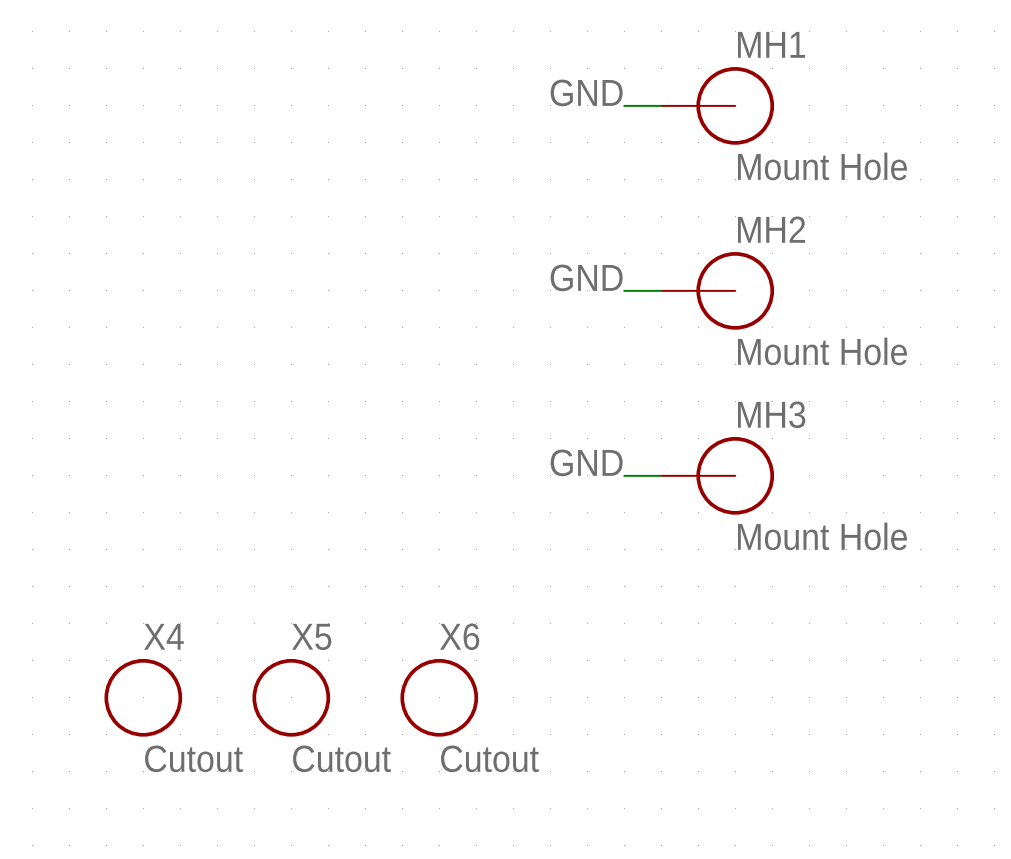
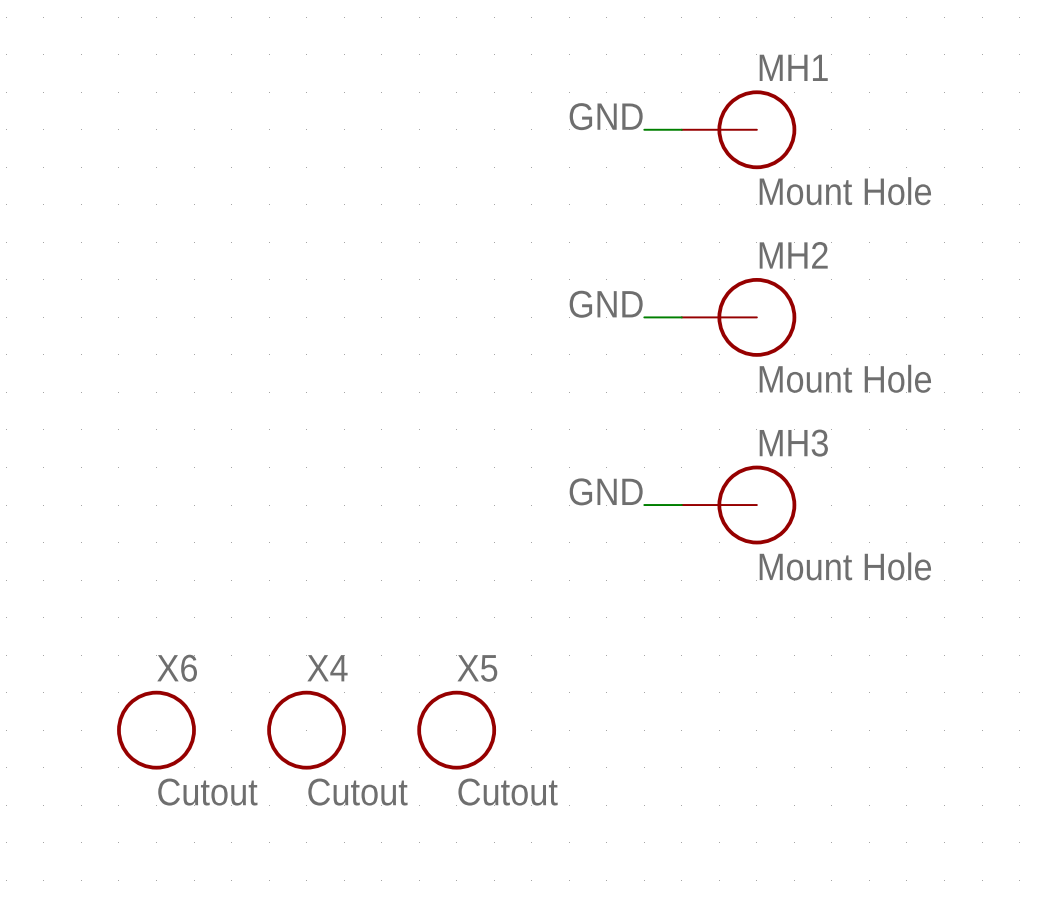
X4 name: X4 (163, 636) -> X6 (177, 668)
X5 name: X5 (311, 636) -> X4 (327, 668)
X6 name: X6 (459, 636) -> X5 (477, 668)

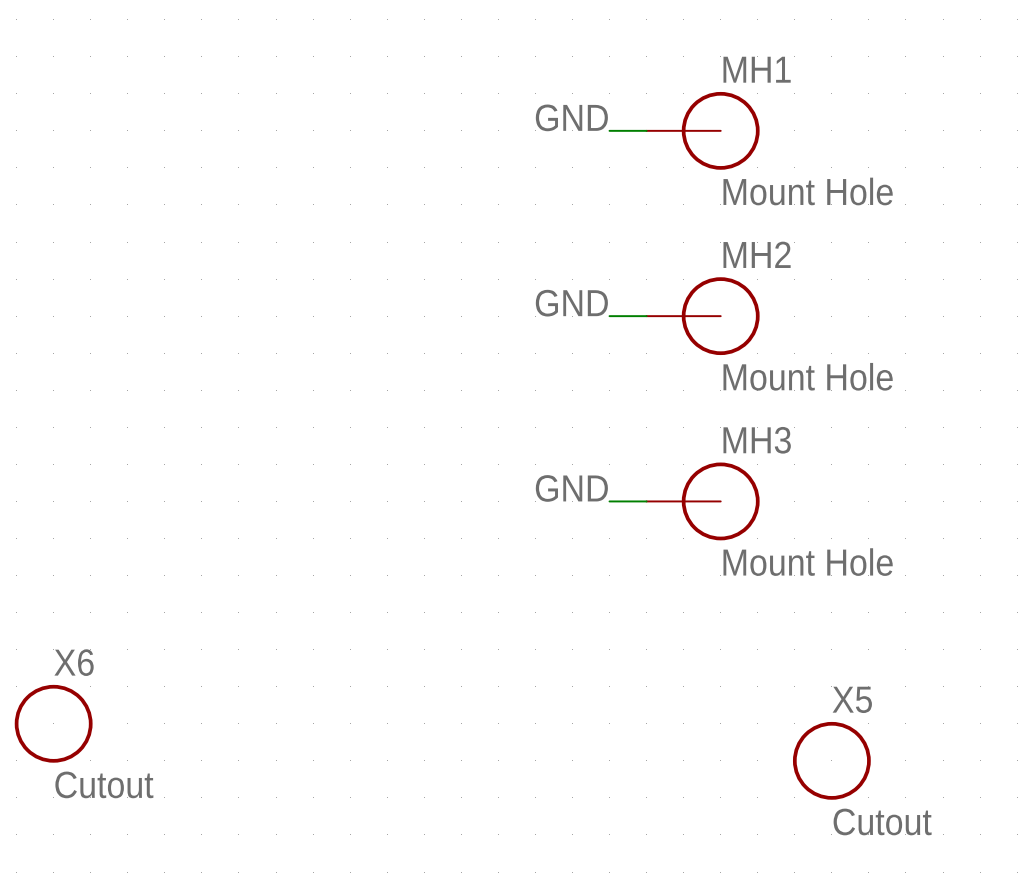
X6 position: (156, 730) -> (53, 723)
X4: (306, 730) -> none
X5 position: (456, 730) -> (831, 760)

